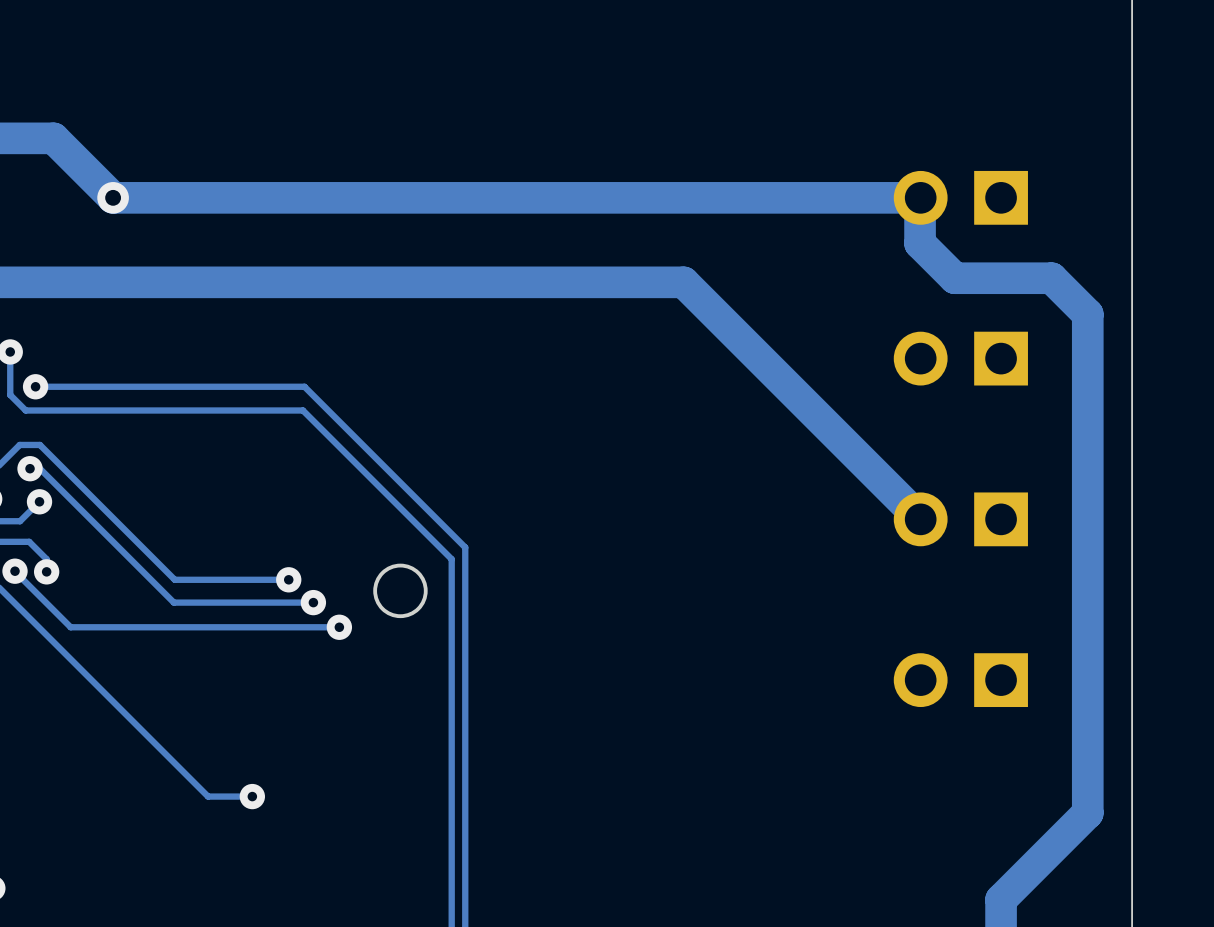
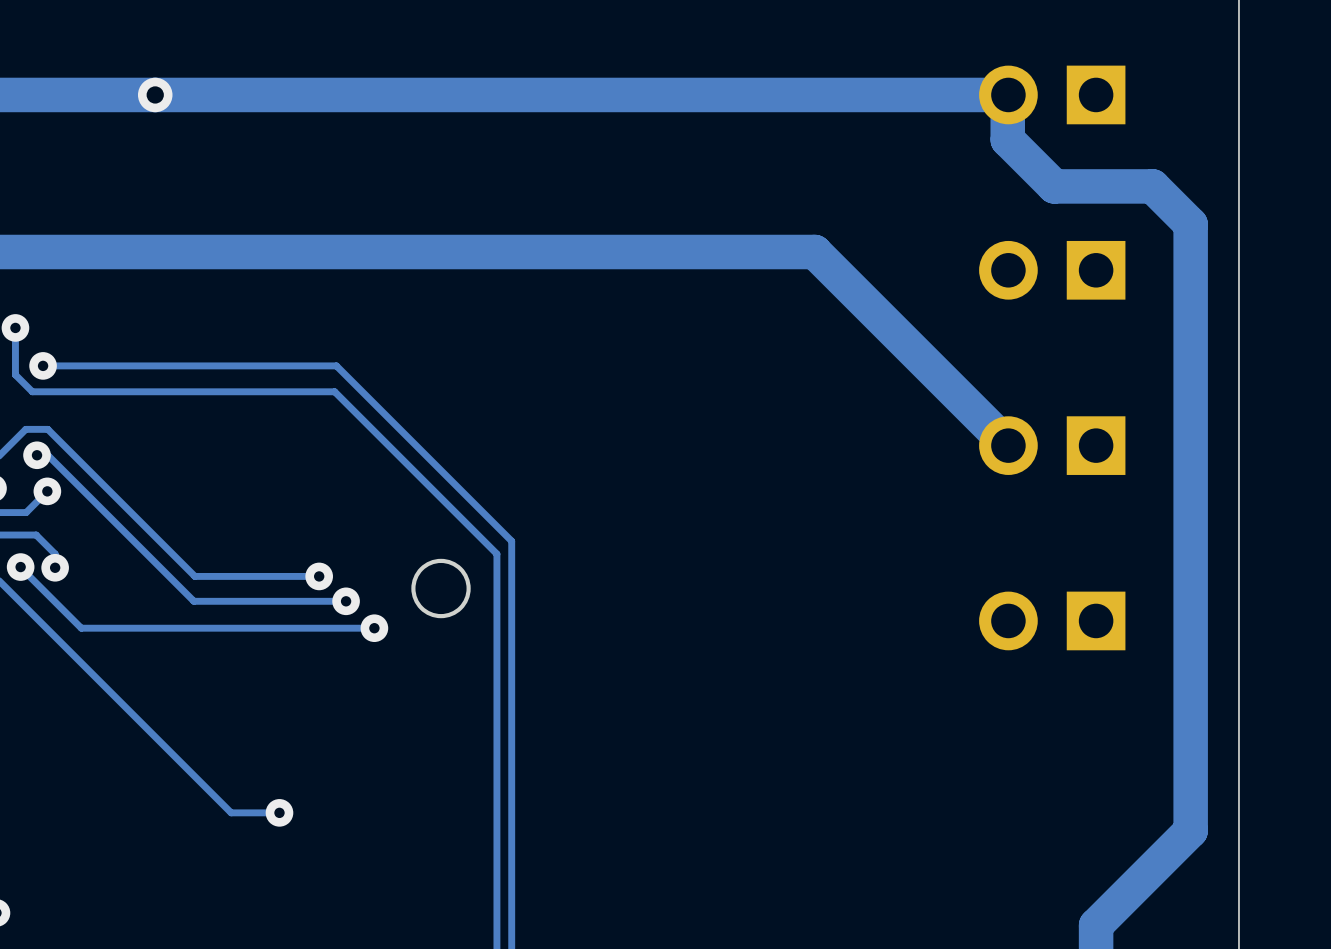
track: (53, 138) (113, 197) (920, 197) (920, 243) (954, 278) (1051, 278) (1087, 314) -> (62, 94) (1008, 94) (1007, 139) (1054, 186) (1152, 186) (1190, 224) (1190, 286)
part: none -> (1052, 94)
via position: (113, 197) -> (155, 94)
part: (960, 197) -> none
track: (683, 282) (920, 519) -> (749, 252) (814, 252) (1008, 445)
part: none -> (1052, 270)
part: (960, 358) -> none
part: none -> (1052, 445)
part: (960, 519) -> none
part: none -> (1052, 620)
part: (960, 680) -> none

